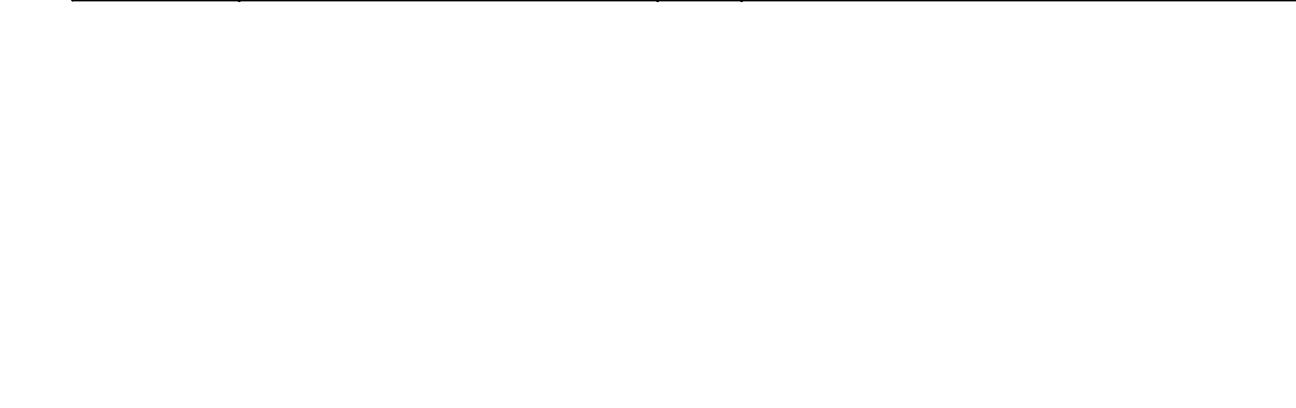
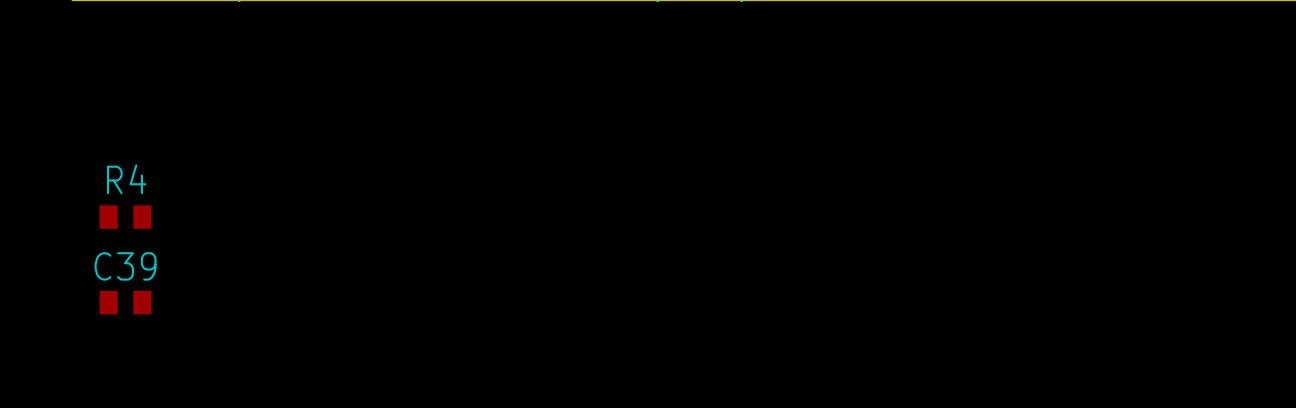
R4: none -> (125, 217)
C39: none -> (125, 302)

